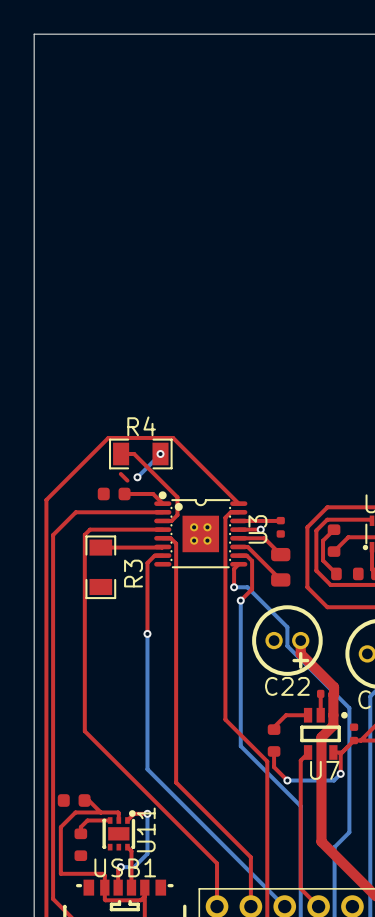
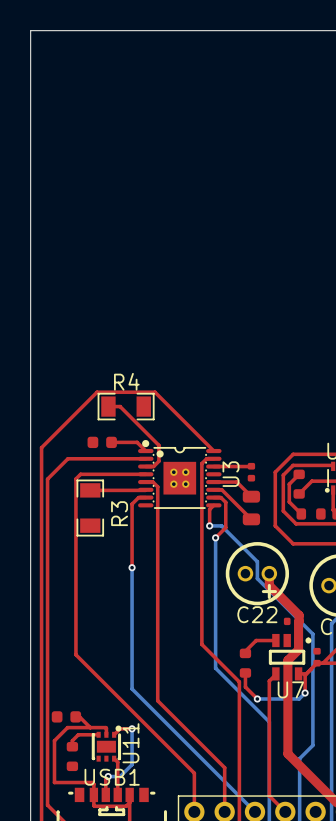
bottom track: (160, 453) (137, 477) -> none
via: (160, 453) -> none
top track: (120, 473) (127, 480) -> none
via: (137, 477) -> none
top track: (238, 529) (260, 529) -> none
via: (260, 529) -> none
top track: (320, 693) (320, 715) -> none

